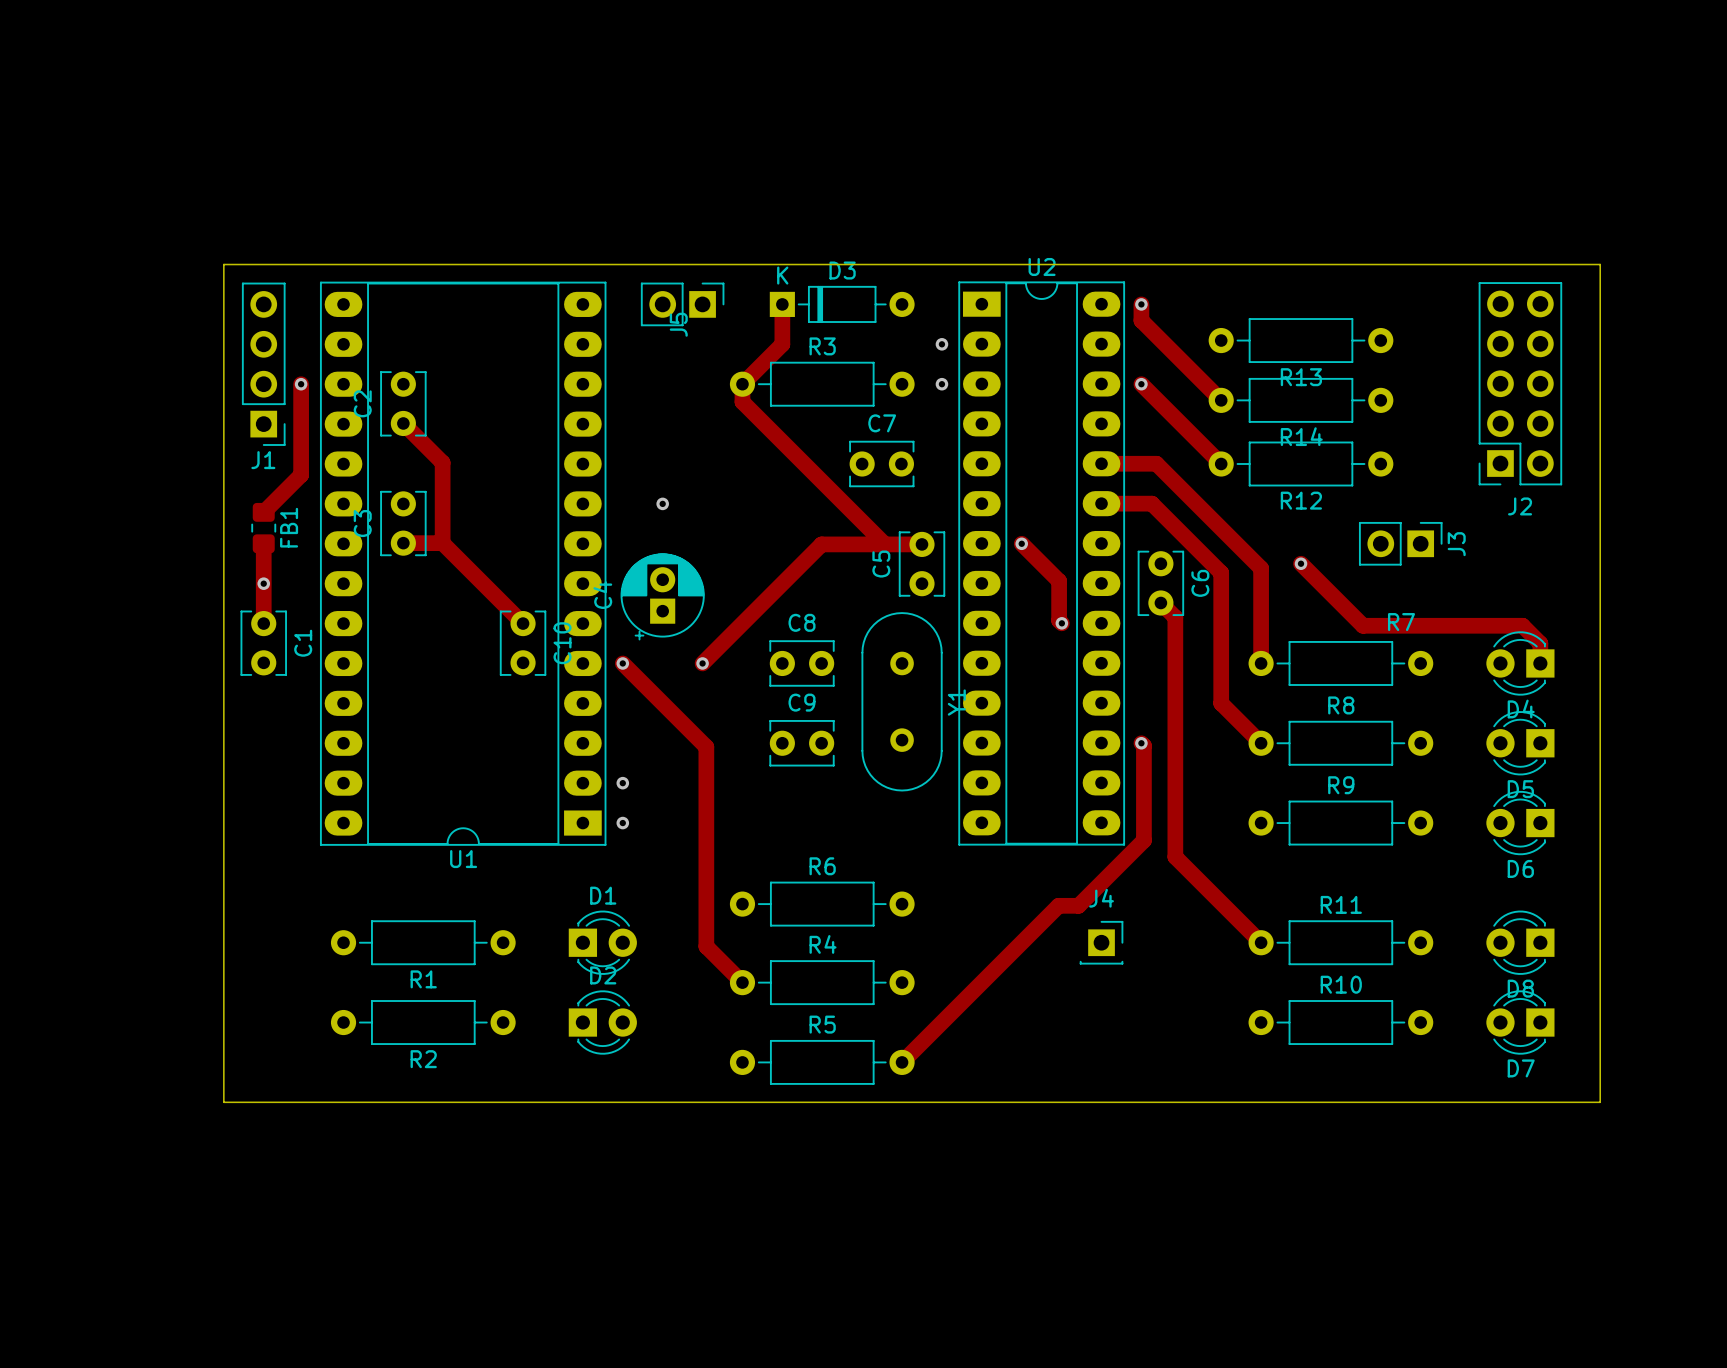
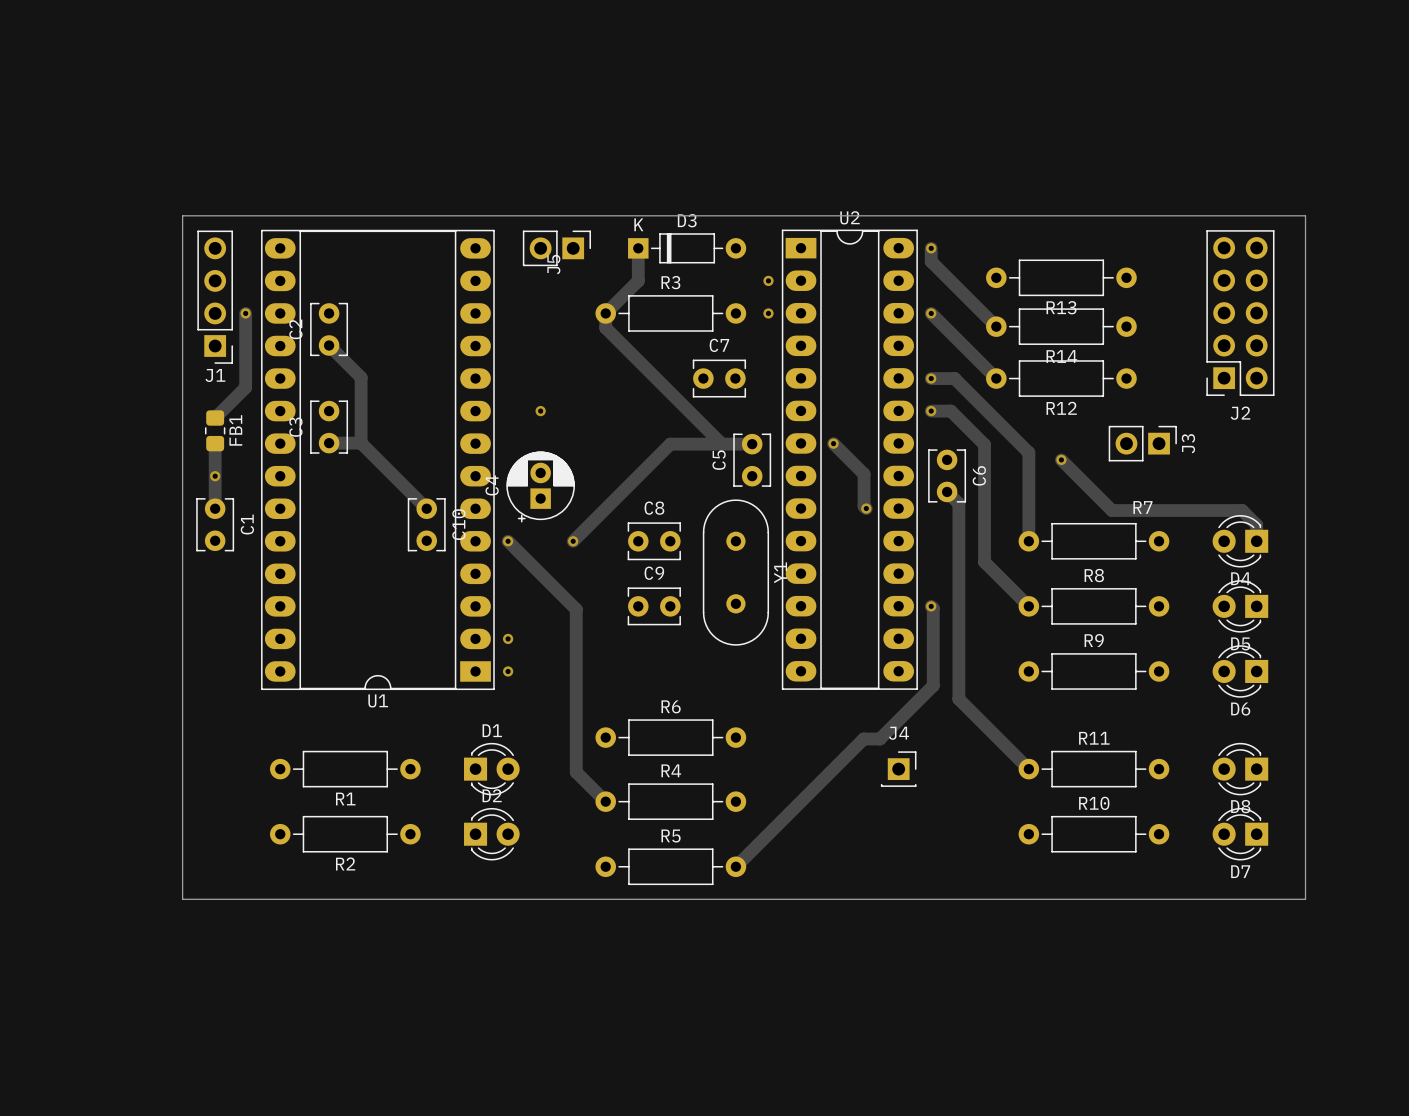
track: (1101, 463) (1156, 463) (1261, 568) -> (931, 378) (954, 378) (1028, 452) (1028, 463)
via: none -> (931, 378)
track: (1101, 503) (1151, 503) (1221, 572) (1221, 703) -> (931, 411) (950, 411) (984, 444) (984, 562) (996, 573)
via: none -> (931, 411)

